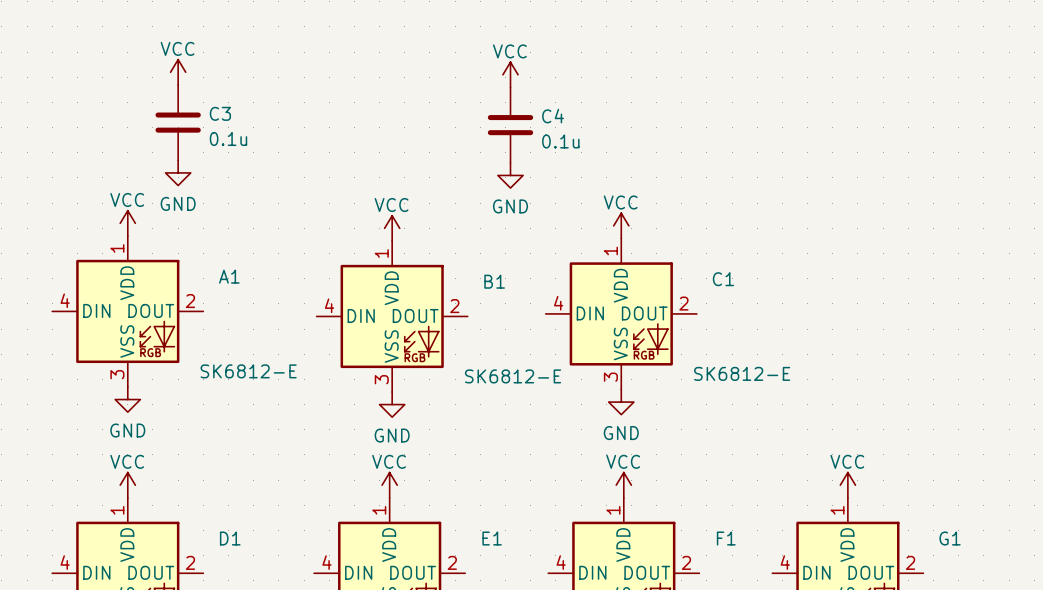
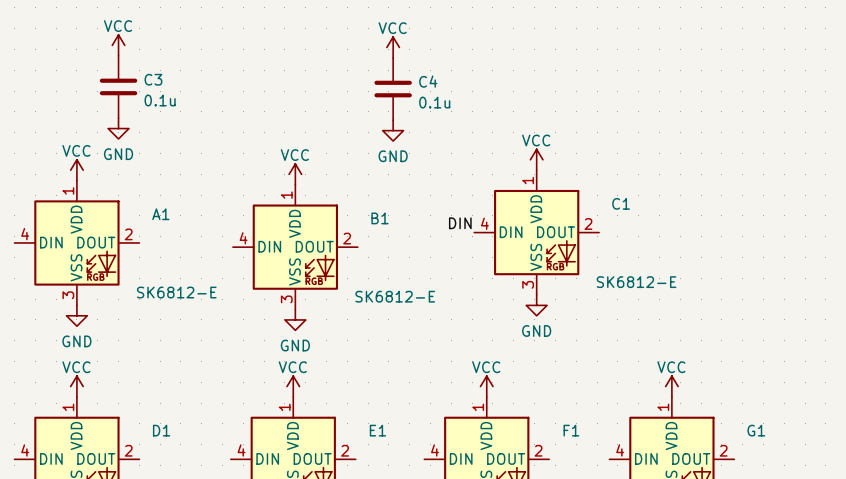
power symbol position: VCC (621, 225) -> VCC (536, 159)
label: none -> DIN (460, 223)
C1 position: (621, 313) -> (536, 232)
power symbol position: GND (621, 402) -> GND (536, 305)

